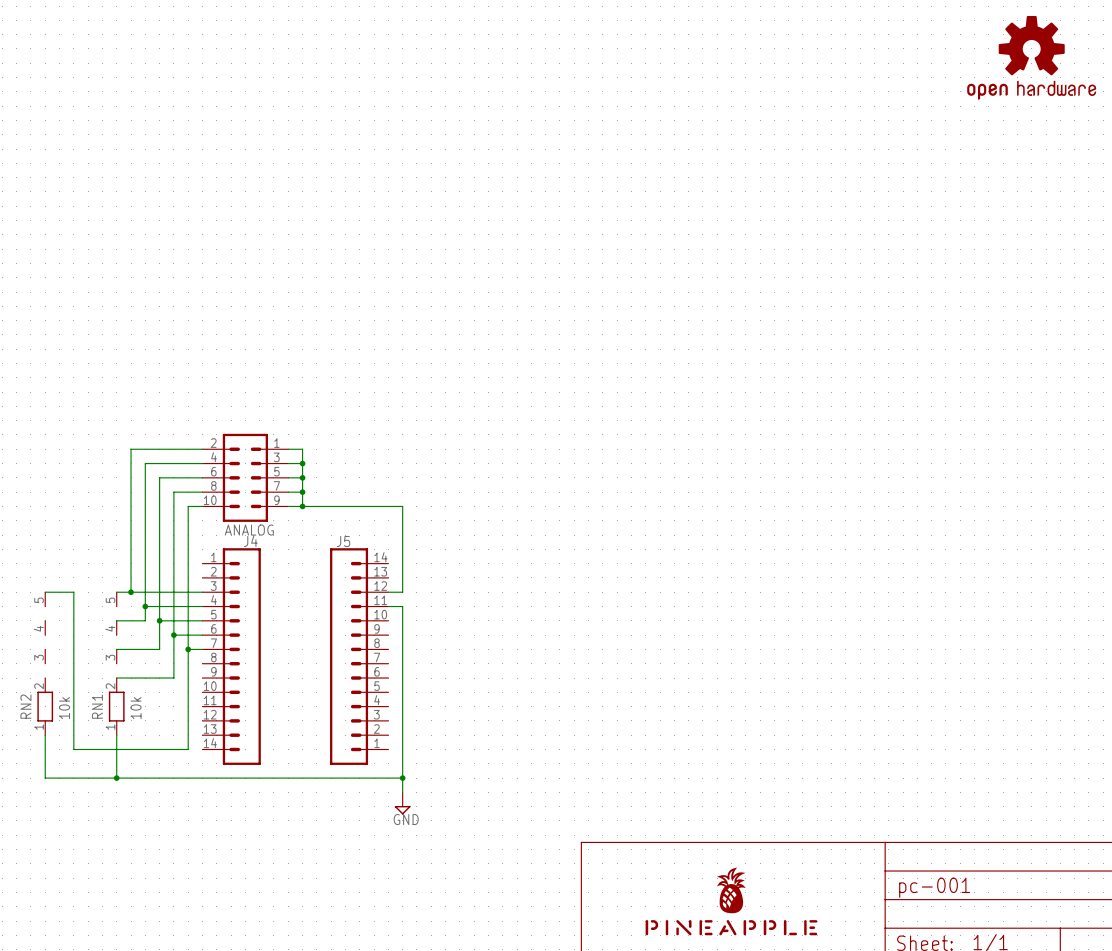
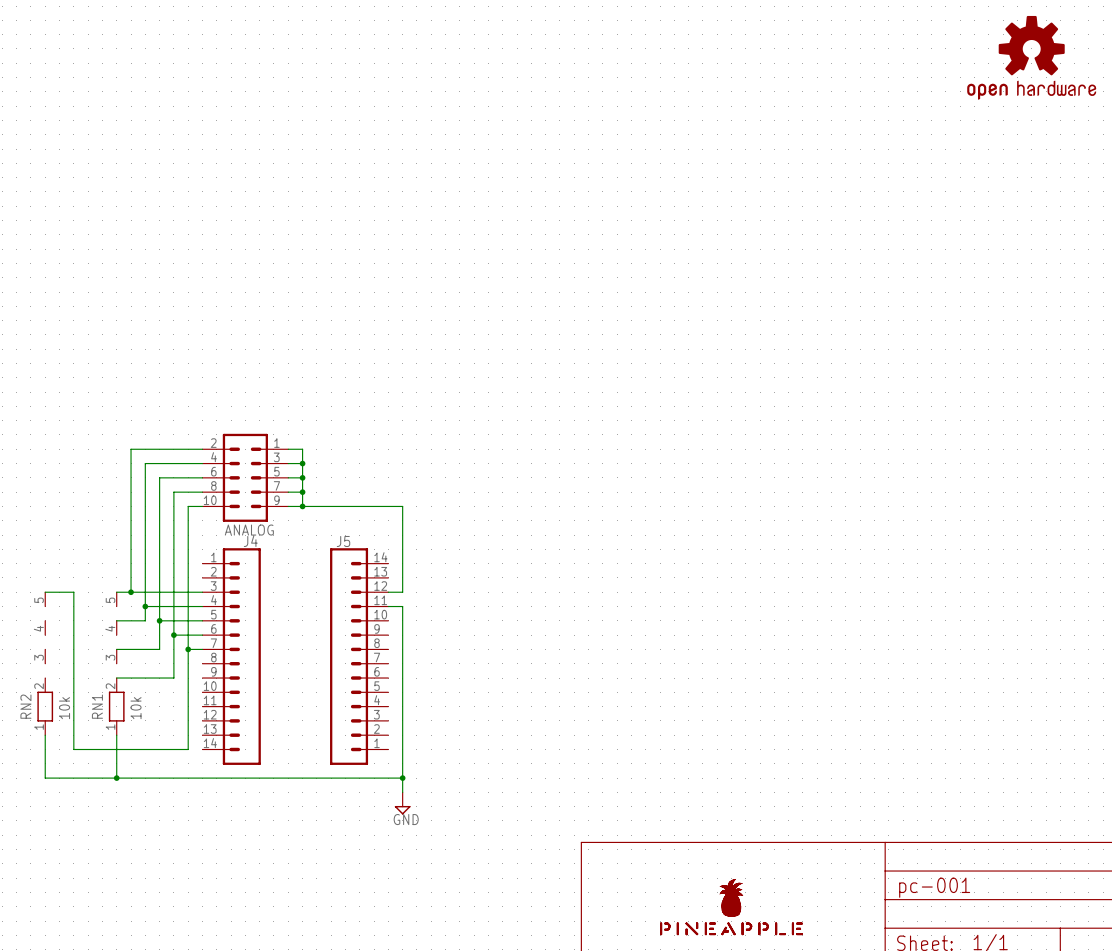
part: (731, 901) -> none
part: none -> (731, 907)

